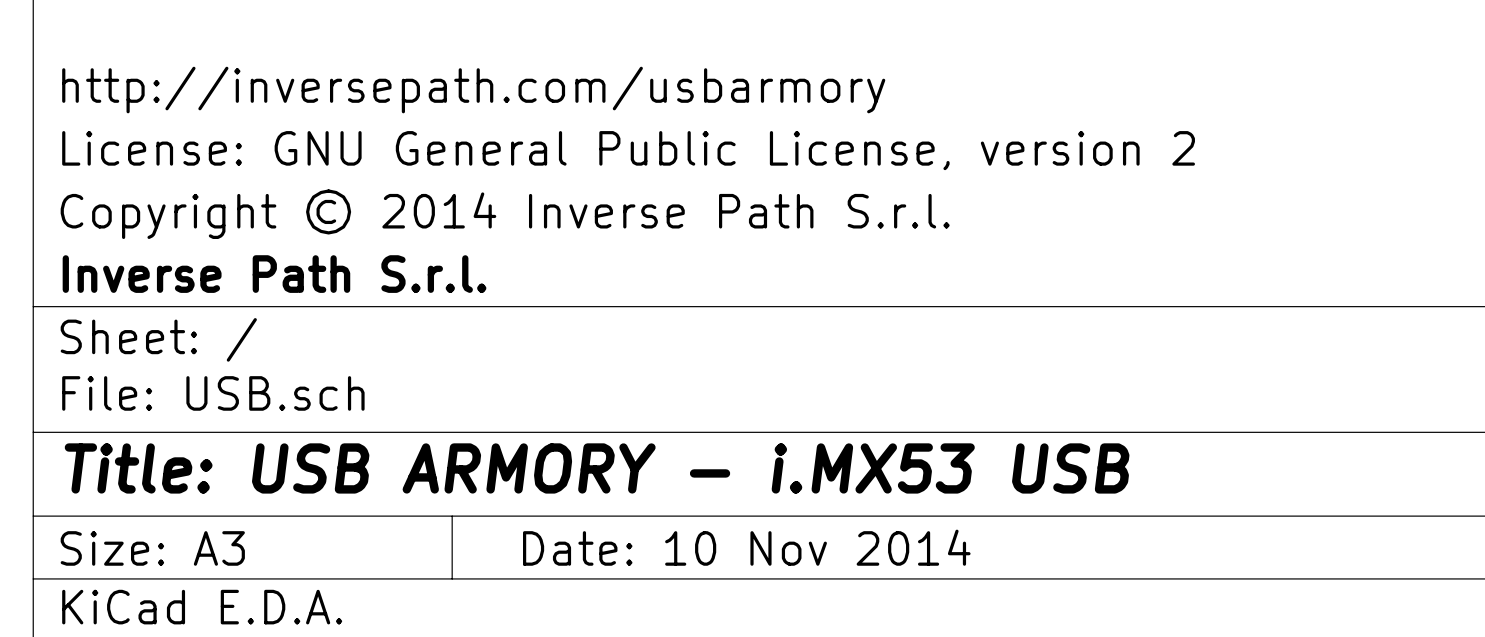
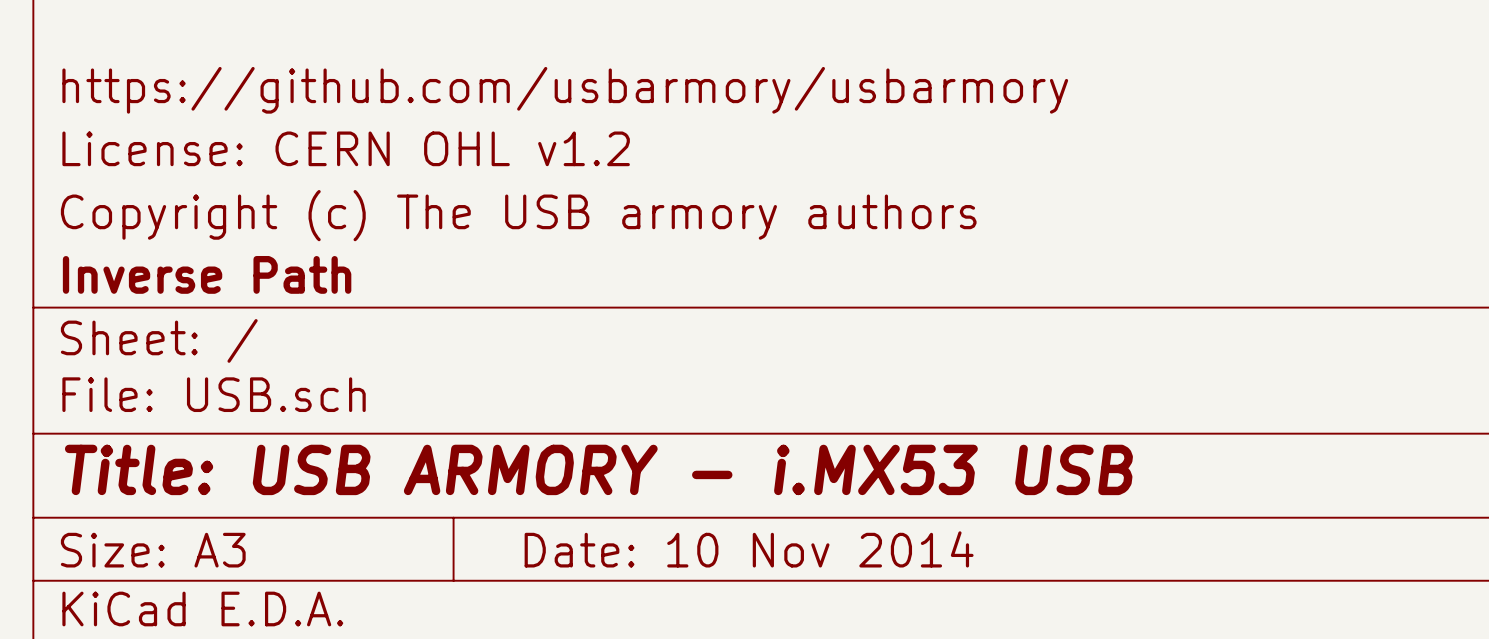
title block: http://inversepath.com/usbarmory (473, 90) -> https://github.com/usbarmory/usbarmory (565, 90)
title block: License: GNU General Public License, version 2 (628, 150) -> License: CERN OHL v1.2 (346, 148)
title block: Copyright © 2014 Inverse Path S.r.l. (505, 214) -> Copyright (c) The USB armory authors (518, 215)
title block: Inverse Path S.r.l. (274, 274) -> Inverse Path (207, 274)

